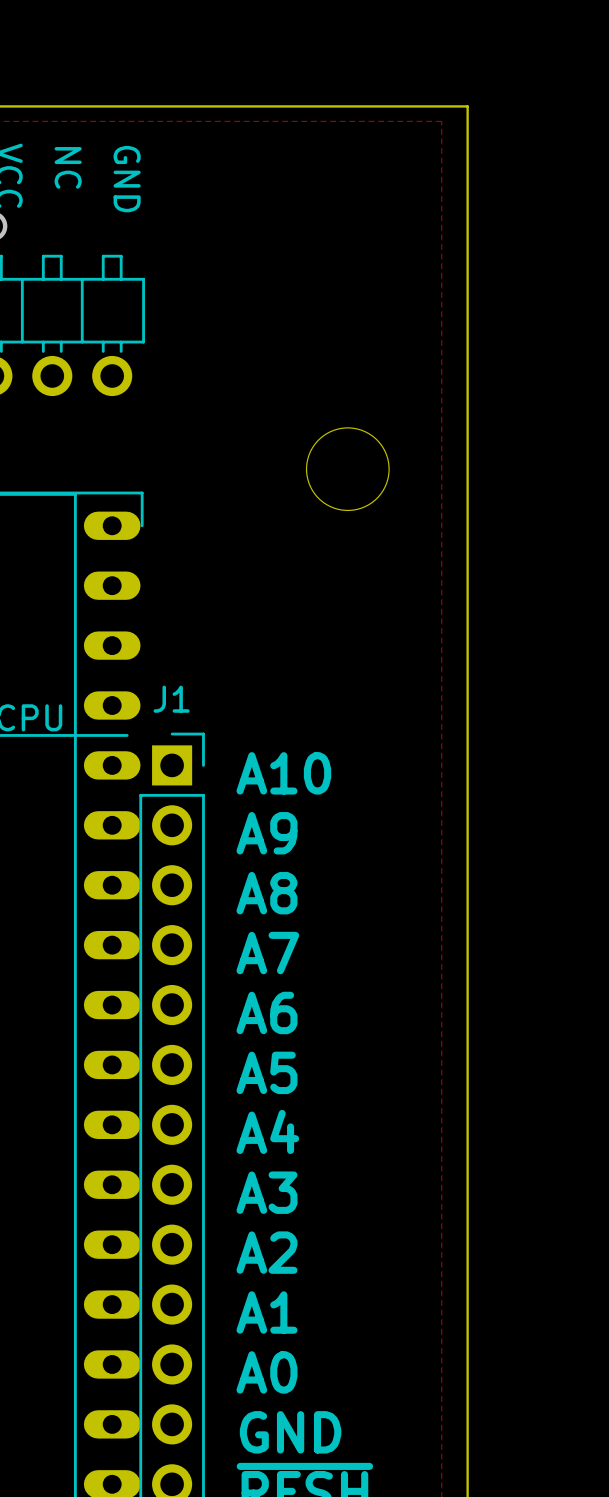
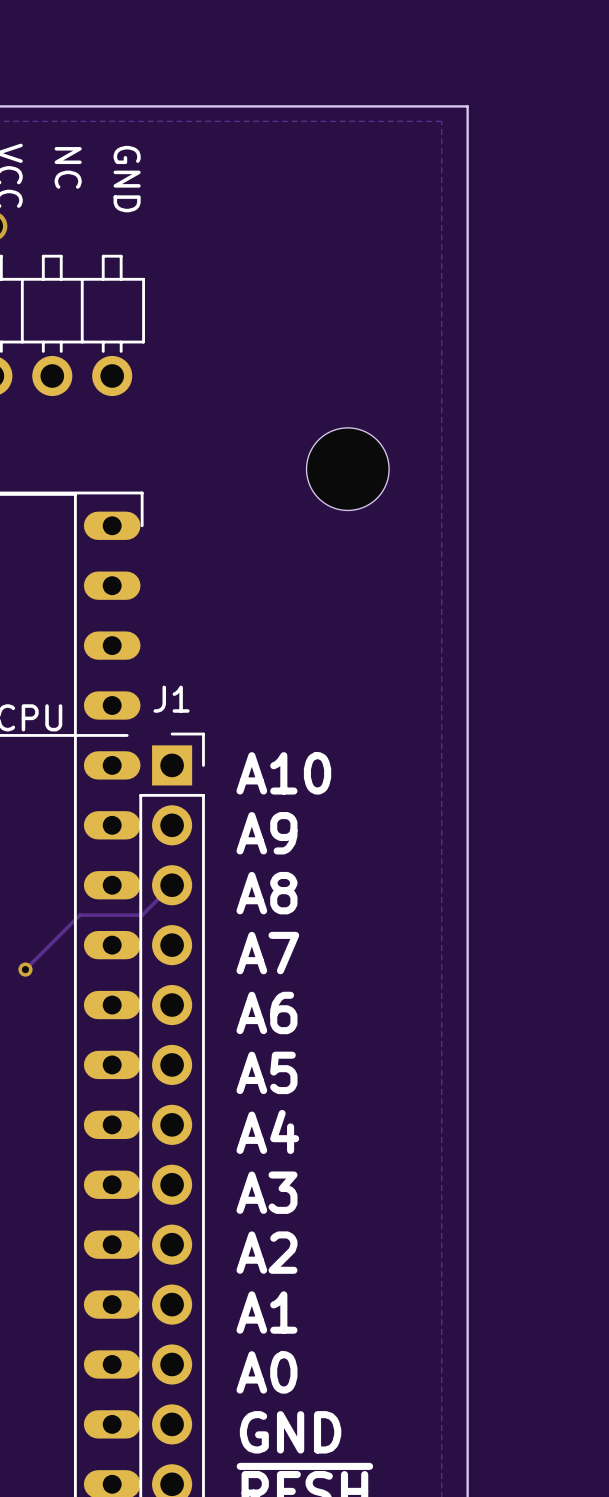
track: none -> (172, 885) (142, 915) (79, 915) (25, 969)
via: none -> (25, 969)

